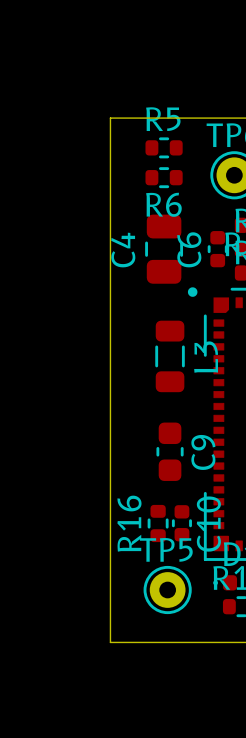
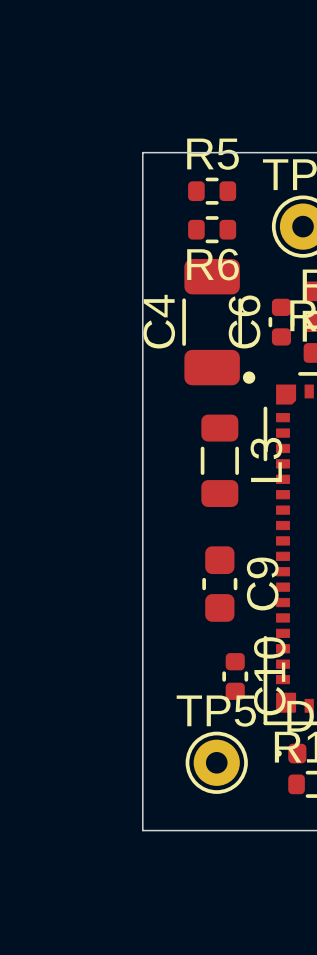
C4 footprint: [145, 214, 184, 284] -> [182, 258, 243, 386]
R16: (158, 523) -> none

